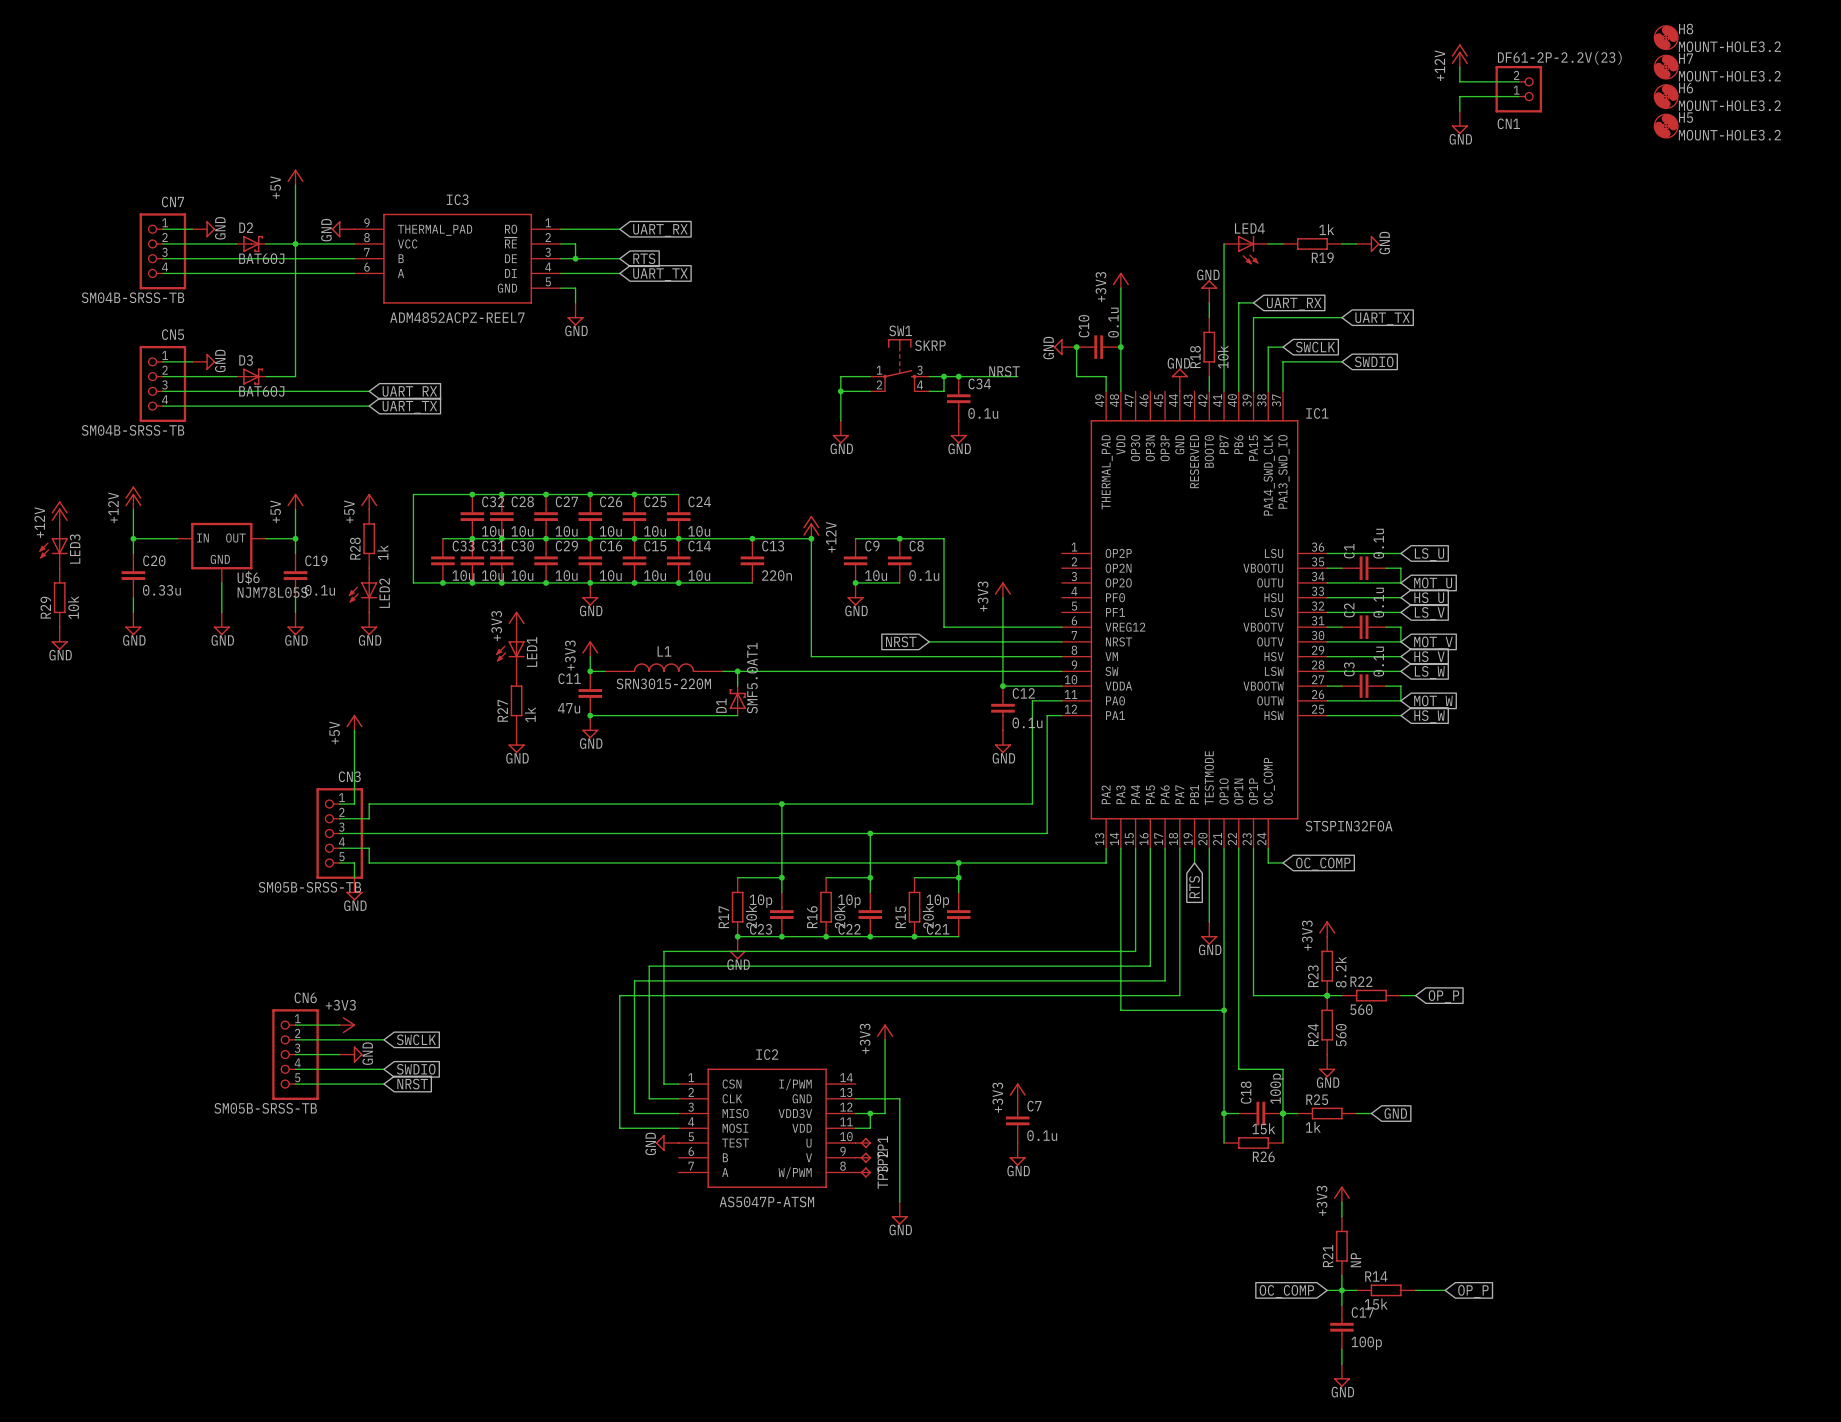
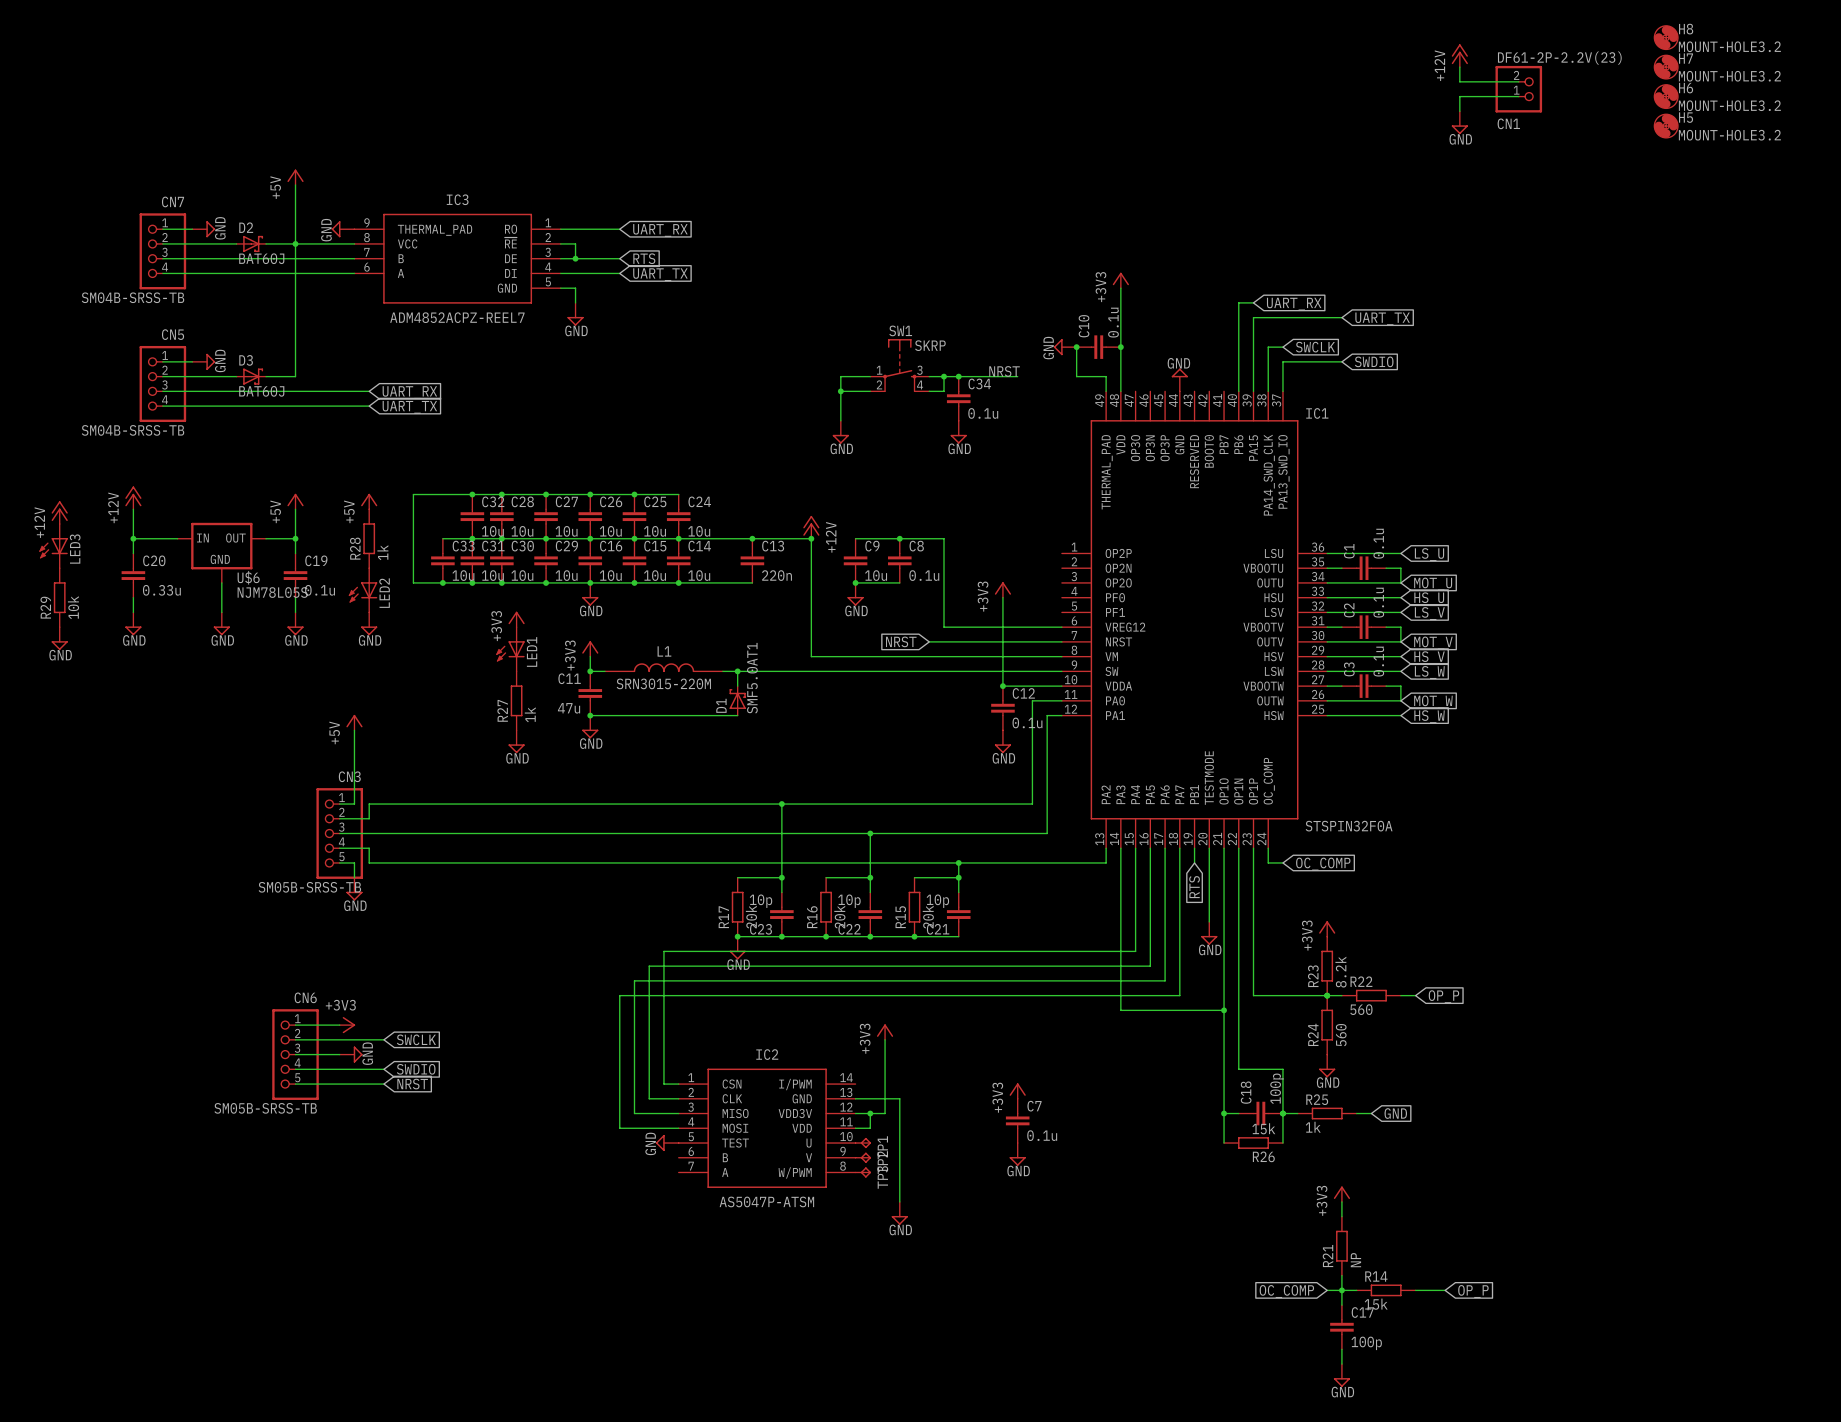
wire: (1224, 243) (1224, 391) -> none
wire: (1268, 243) (1282, 243) -> none
R19: 1k (1312, 243) -> none
wire: (1341, 243) (1356, 243) -> none
power symbol: GND (1368, 243) -> none
LED4: (1246, 250) -> none
power symbol: GND (1209, 291) -> none
wire: (1209, 302) (1209, 317) -> none
R18: 10k (1209, 347) -> none
wire: (1209, 376) (1209, 391) -> none

